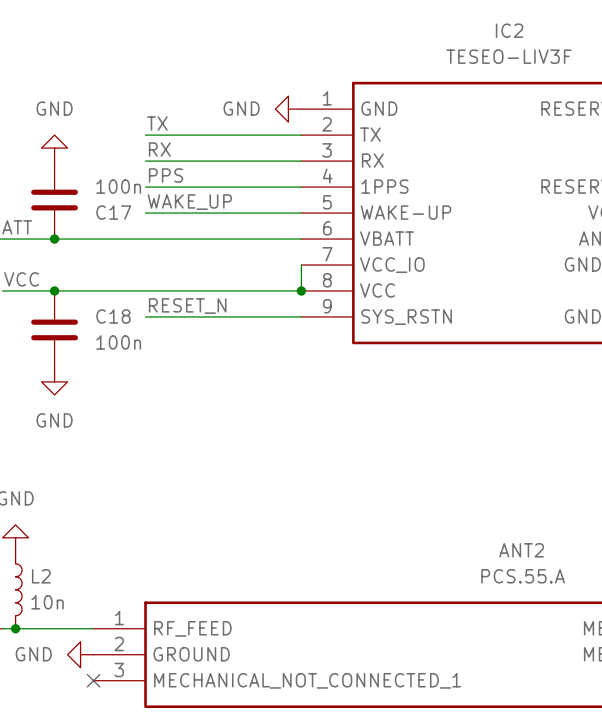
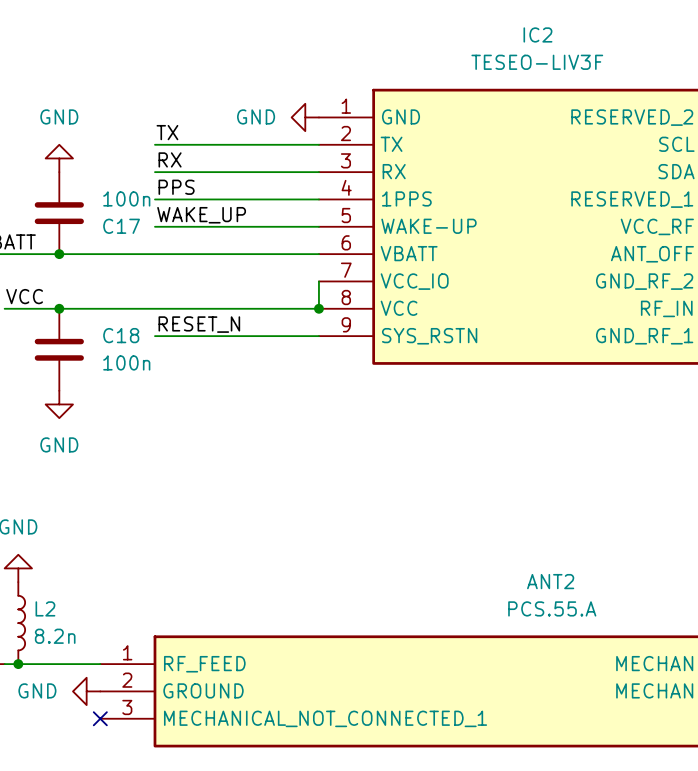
L2 value: 10n (47, 602) -> 8.2n (55, 636)

